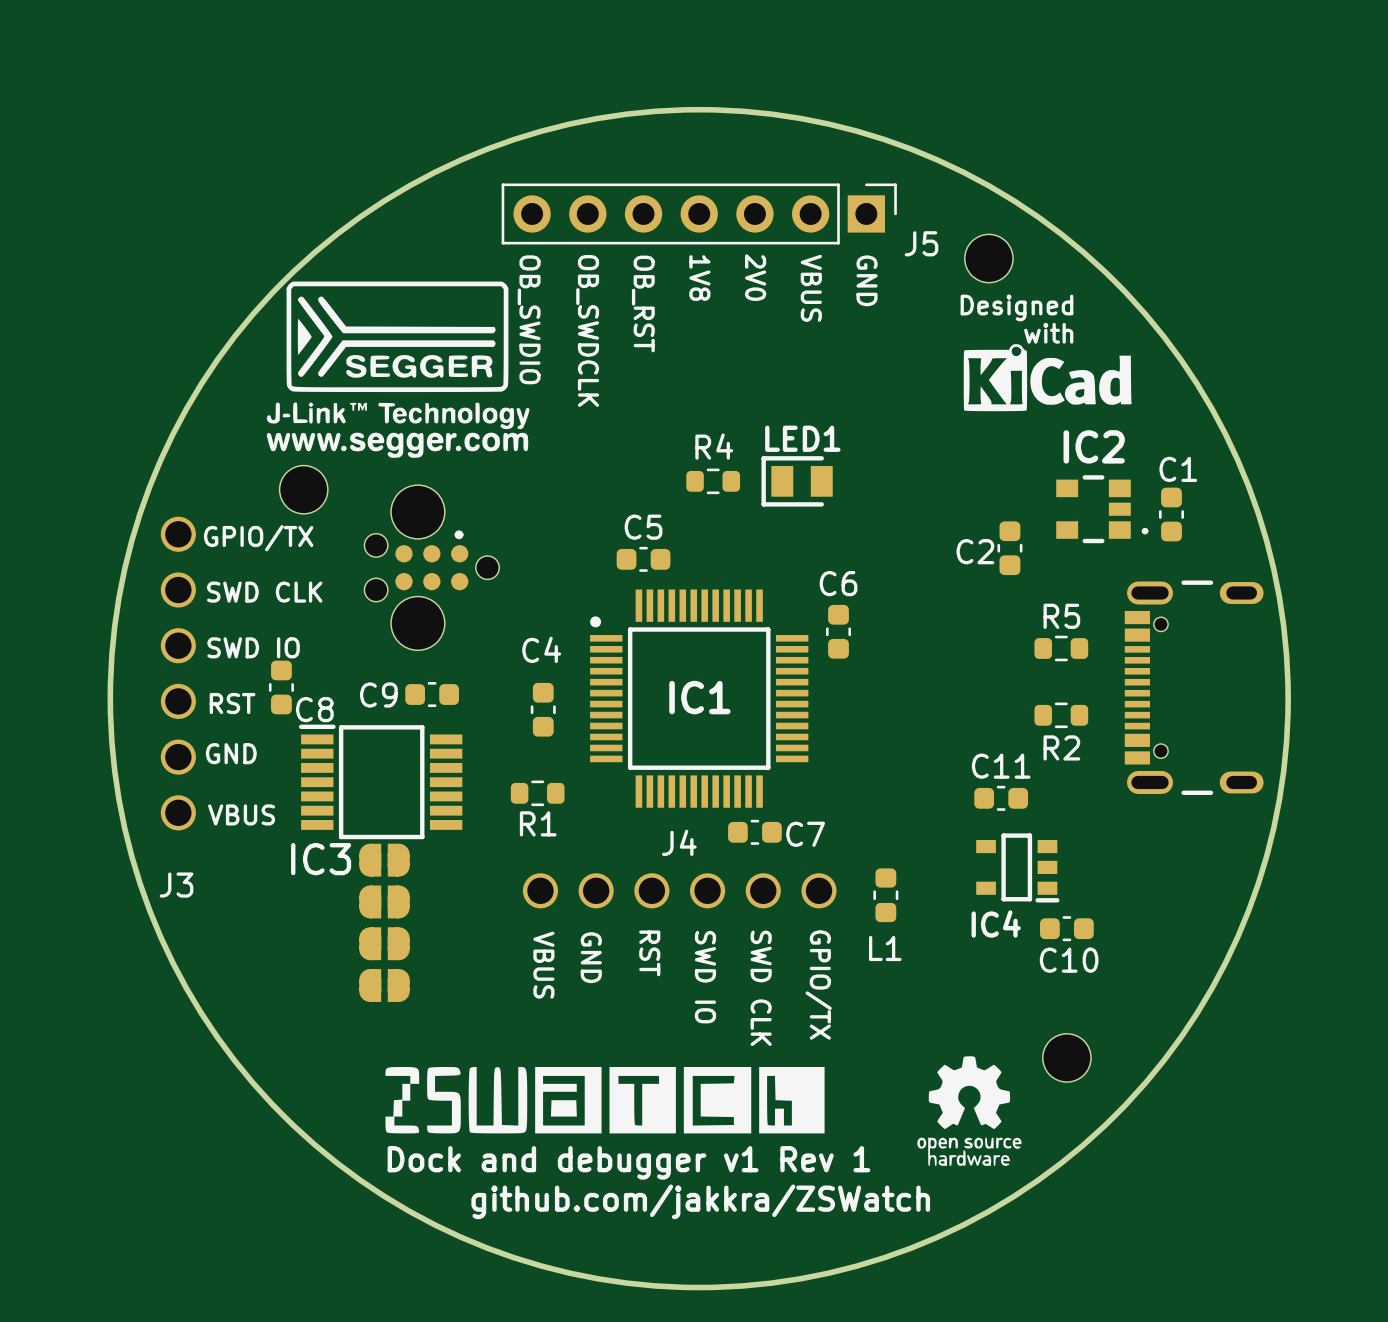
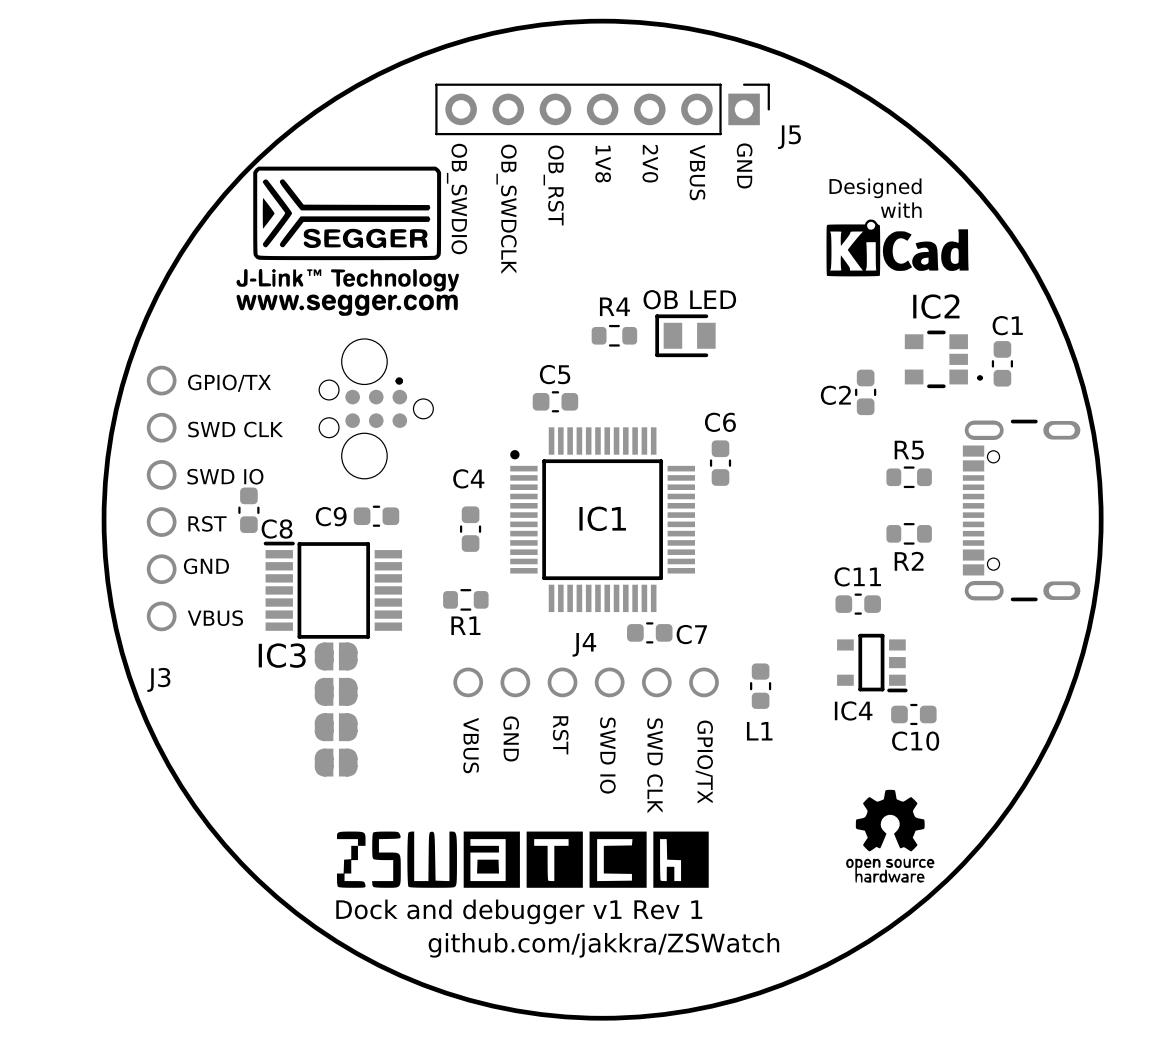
part: (988, 258) -> none
LED1 name: LED1 (802, 438) -> OB LED (689, 299)
part: (303, 489) -> none
part: (1066, 1057) -> none
drawing position: (969, 1111) -> (890, 836)

